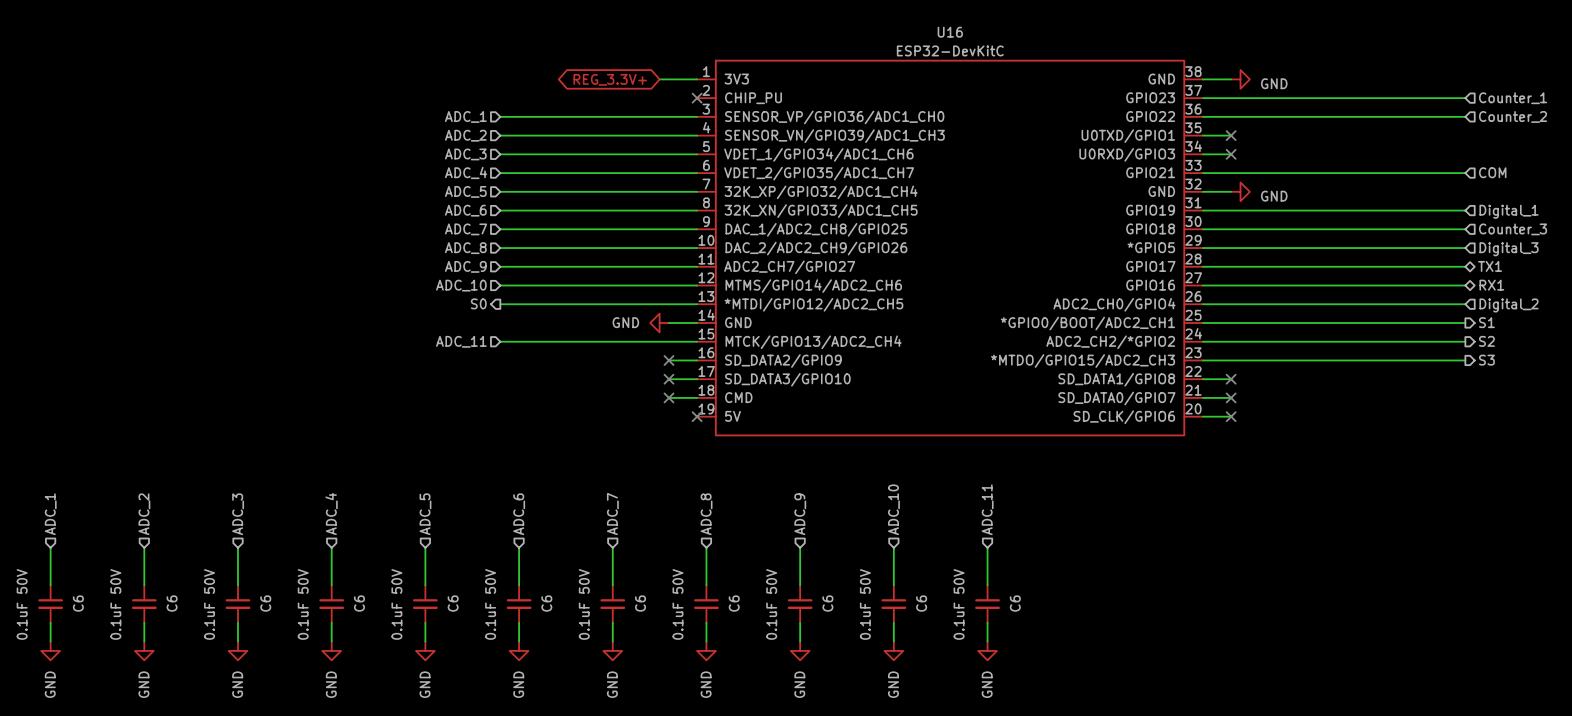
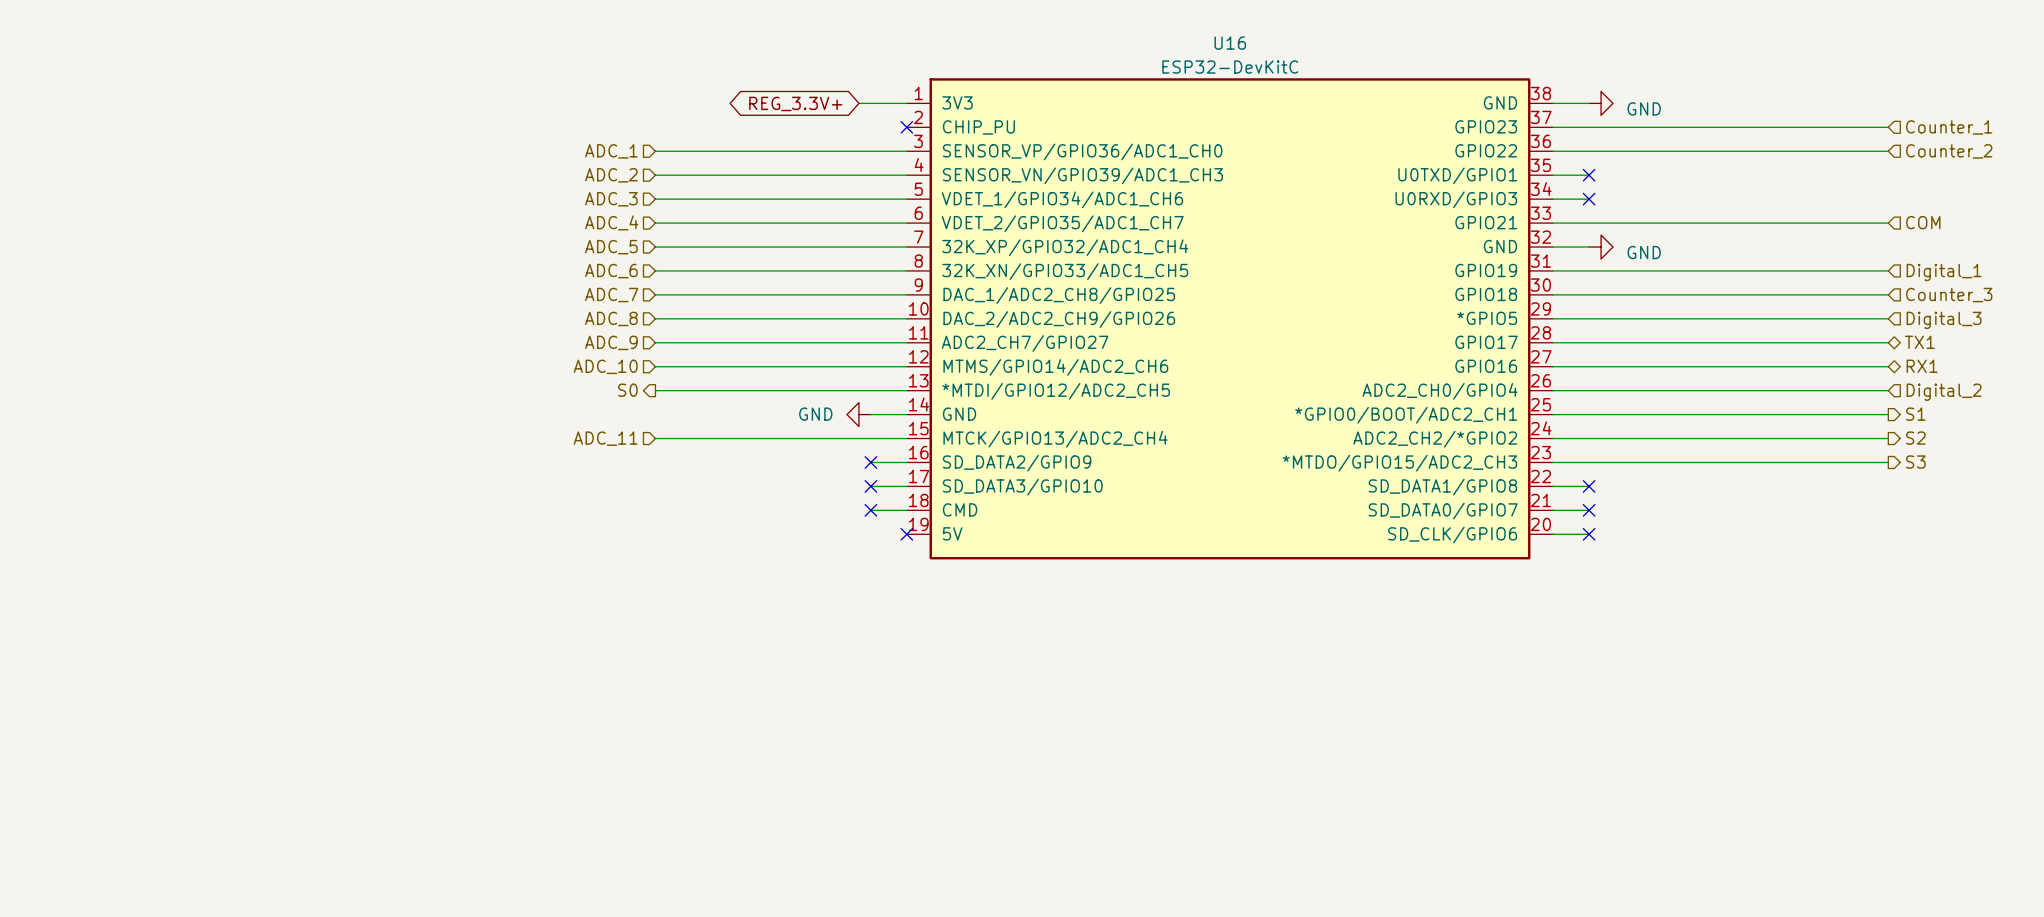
hierarchical label: ADC_10 (893, 509) -> none
hierarchical label: ADC_11 (987, 509) -> none
hierarchical label: ADC_1 (50, 514) -> none
hierarchical label: ADC_2 (144, 514) -> none
hierarchical label: ADC_3 (238, 514) -> none
hierarchical label: ADC_4 (331, 514) -> none
hierarchical label: ADC_5 (425, 514) -> none
hierarchical label: ADC_6 (519, 514) -> none
hierarchical label: ADC_7 (612, 514) -> none
hierarchical label: ADC_8 (706, 514) -> none
hierarchical label: ADC_9 (800, 514) -> none
wire: (50, 547) (50, 585) -> none
wire: (144, 547) (144, 585) -> none
wire: (238, 547) (238, 585) -> none
wire: (331, 547) (331, 585) -> none
wire: (425, 547) (425, 585) -> none
wire: (519, 547) (519, 585) -> none
wire: (612, 547) (612, 585) -> none
wire: (706, 547) (706, 585) -> none
wire: (800, 547) (800, 585) -> none
wire: (893, 547) (893, 585) -> none
wire: (987, 547) (987, 585) -> none
C6: 0.1uF 50V (50, 604) -> none
C6: 0.1uF 50V (144, 604) -> none
C6: 0.1uF 50V (238, 604) -> none
C6: 0.1uF 50V (331, 604) -> none
C6: 0.1uF 50V (425, 604) -> none
C6: 0.1uF 50V (519, 604) -> none
C6: 0.1uF 50V (612, 604) -> none
C6: 0.1uF 50V (706, 604) -> none
C6: 0.1uF 50V (800, 604) -> none
C6: 0.1uF 50V (893, 604) -> none
C6: 0.1uF 50V (987, 604) -> none
wire: (50, 622) (50, 641) -> none
wire: (144, 622) (144, 641) -> none
wire: (238, 622) (238, 641) -> none
wire: (331, 622) (331, 641) -> none
wire: (425, 622) (425, 641) -> none
wire: (519, 622) (519, 641) -> none
wire: (612, 622) (612, 641) -> none
wire: (706, 622) (706, 641) -> none
wire: (800, 622) (800, 641) -> none
wire: (893, 622) (893, 641) -> none
wire: (987, 622) (987, 641) -> none
power symbol: GND (50, 650) -> none
power symbol: GND (144, 650) -> none
power symbol: GND (238, 650) -> none
power symbol: GND (331, 650) -> none
power symbol: GND (425, 650) -> none
power symbol: GND (519, 650) -> none
power symbol: GND (612, 650) -> none
power symbol: GND (706, 650) -> none
power symbol: GND (800, 650) -> none
power symbol: GND (893, 650) -> none
power symbol: GND (987, 650) -> none

